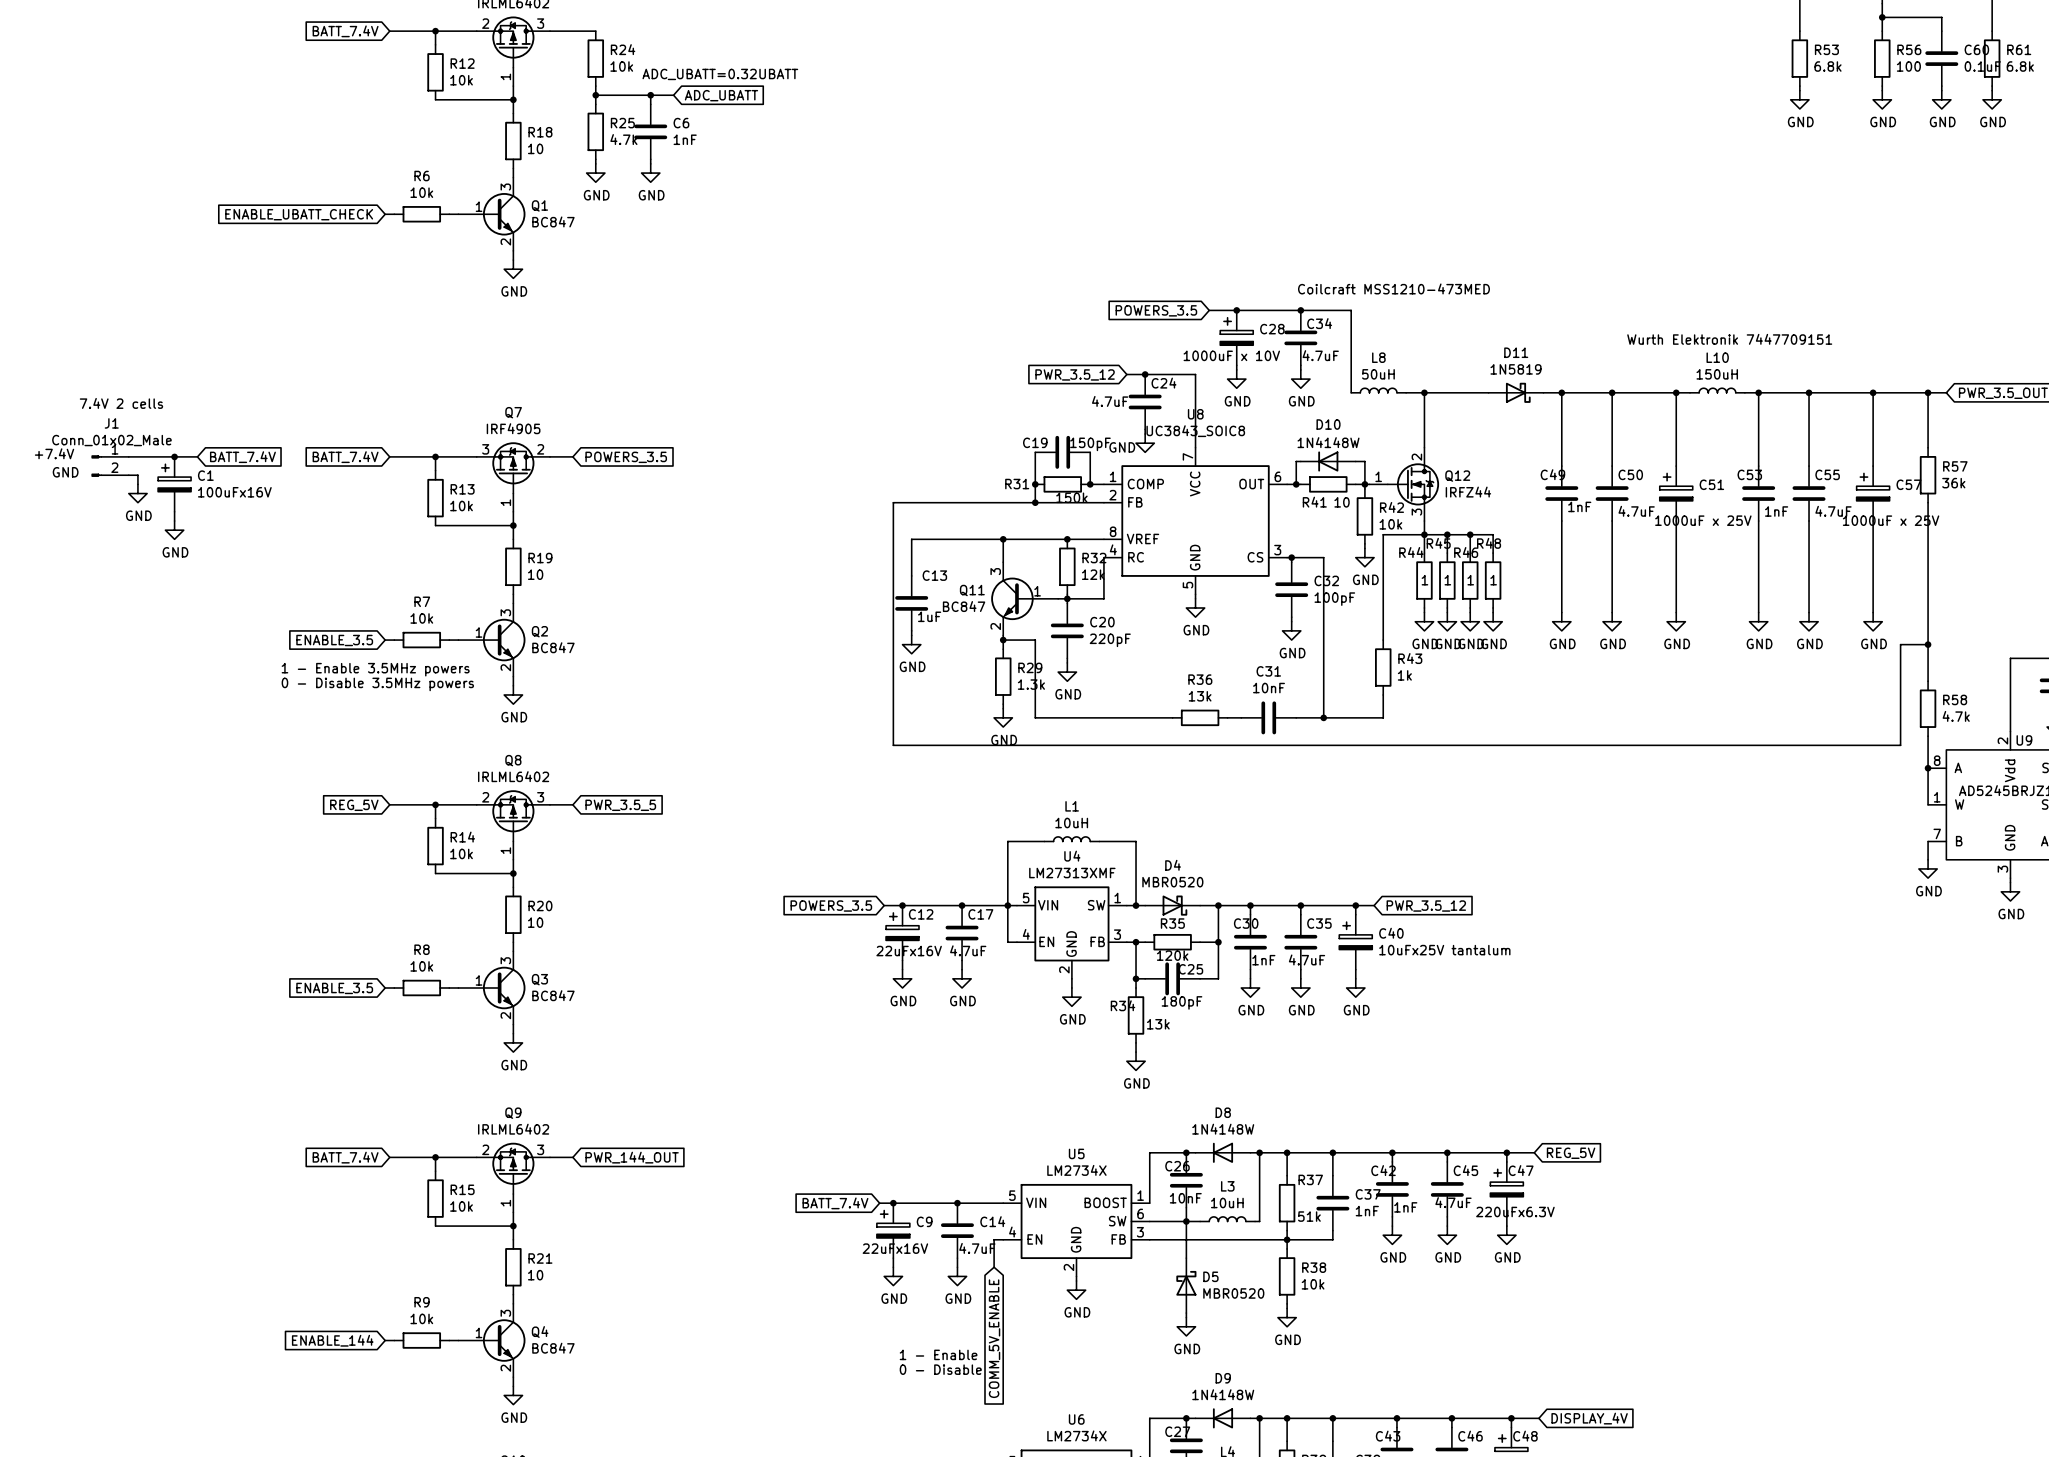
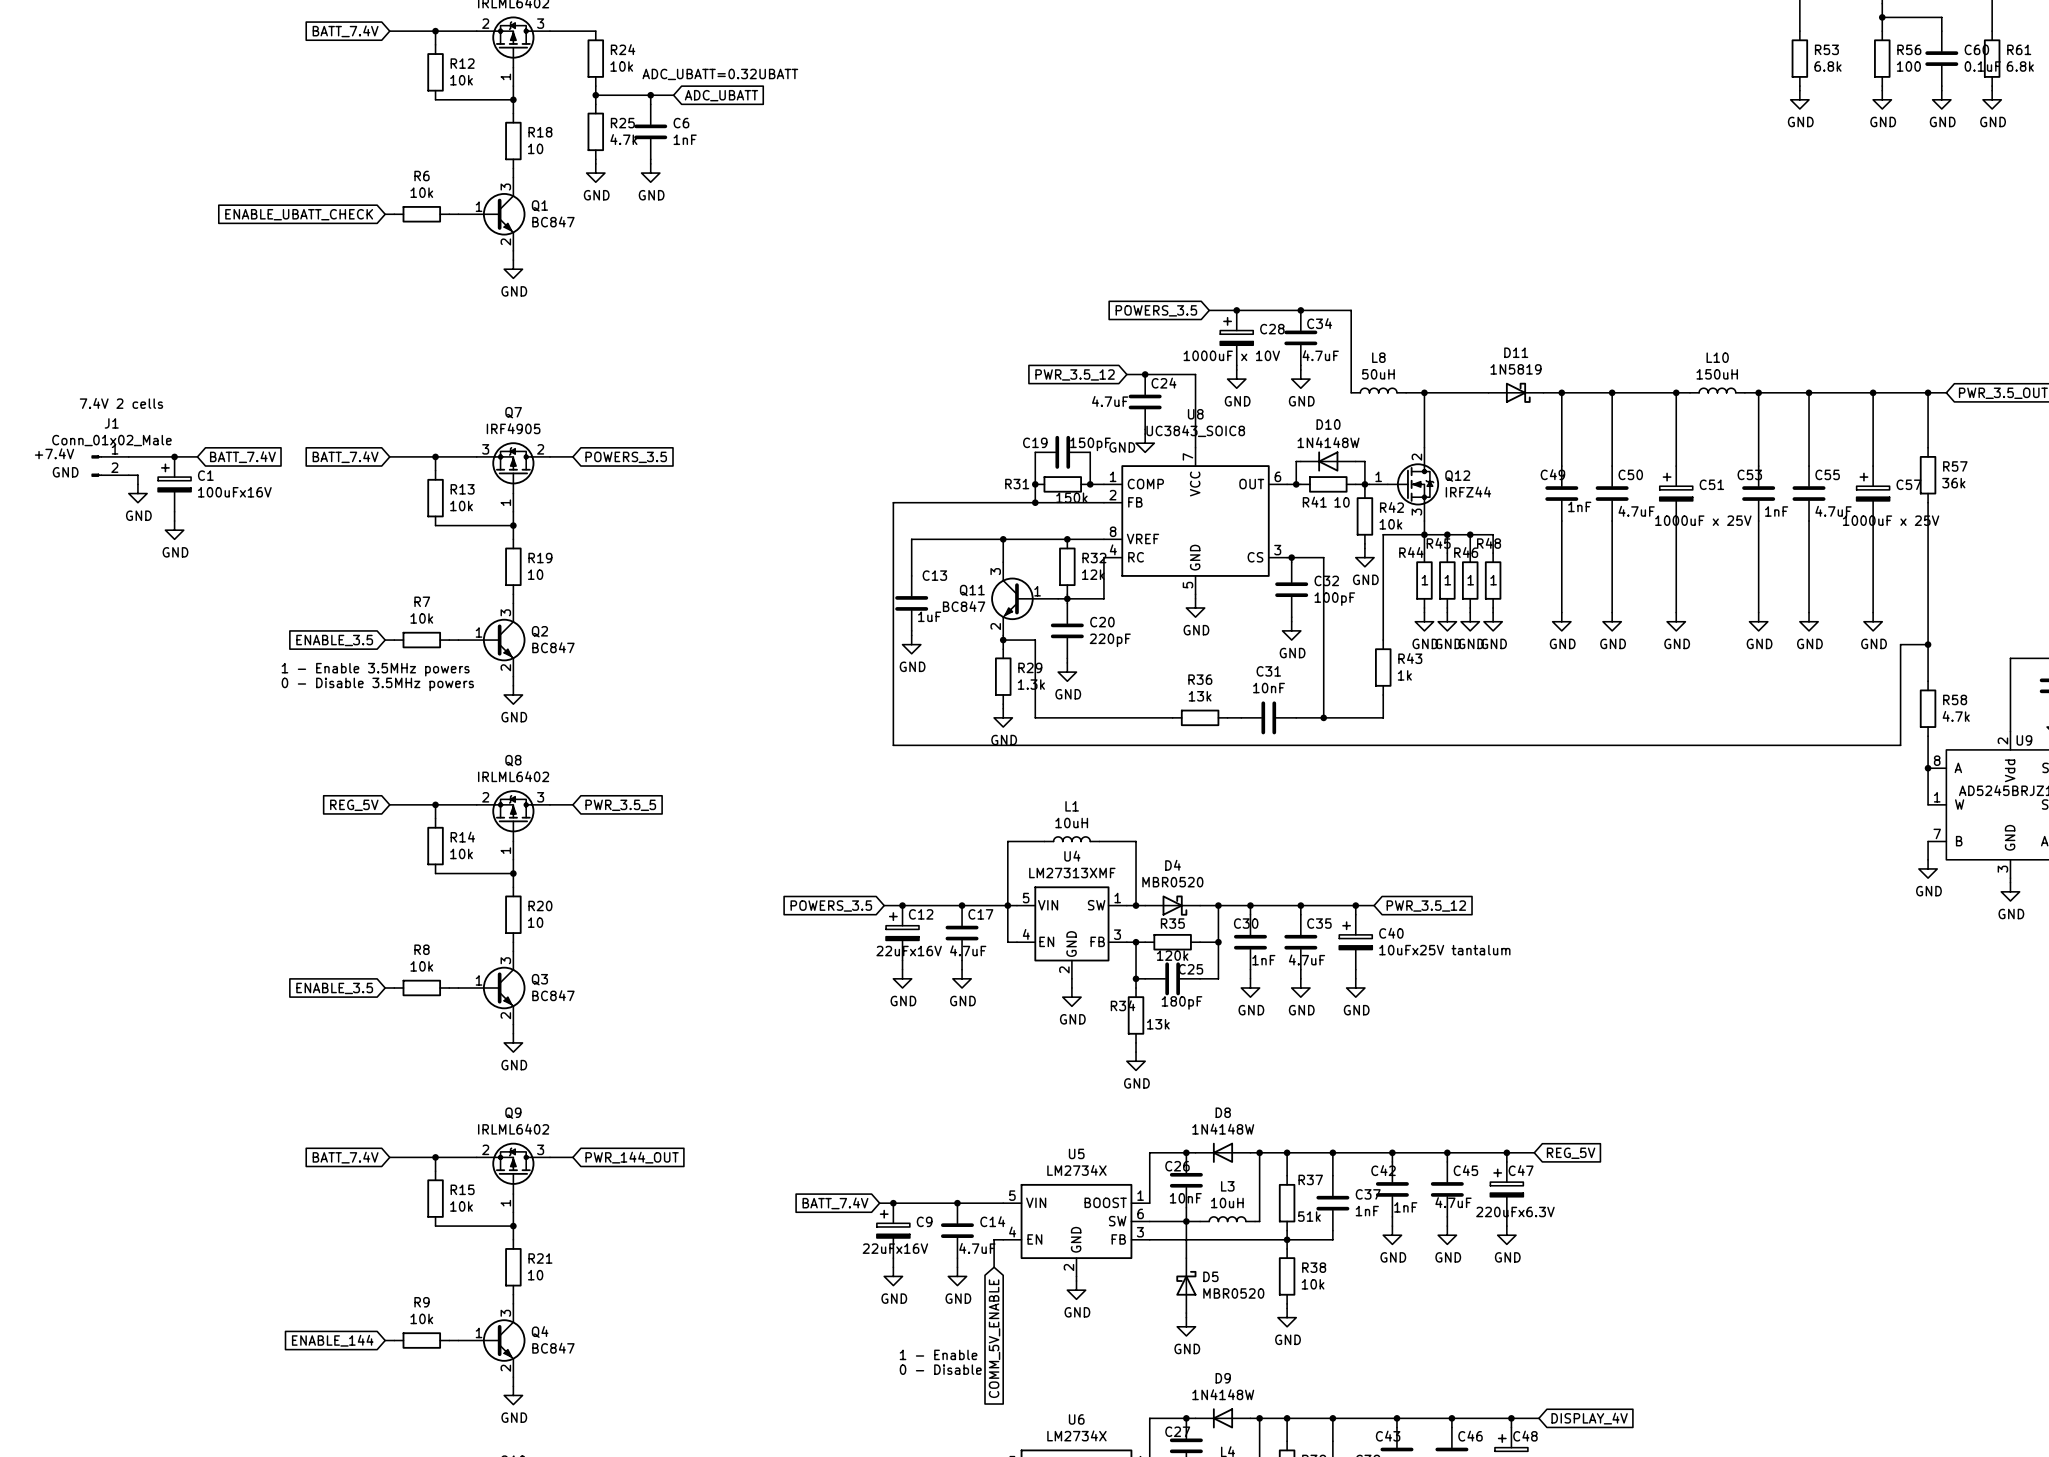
text: Coilcraft MSS1210-473MED (1393, 288) -> none
text: Wurth Elektronik 7447709151 (1729, 339) -> none

